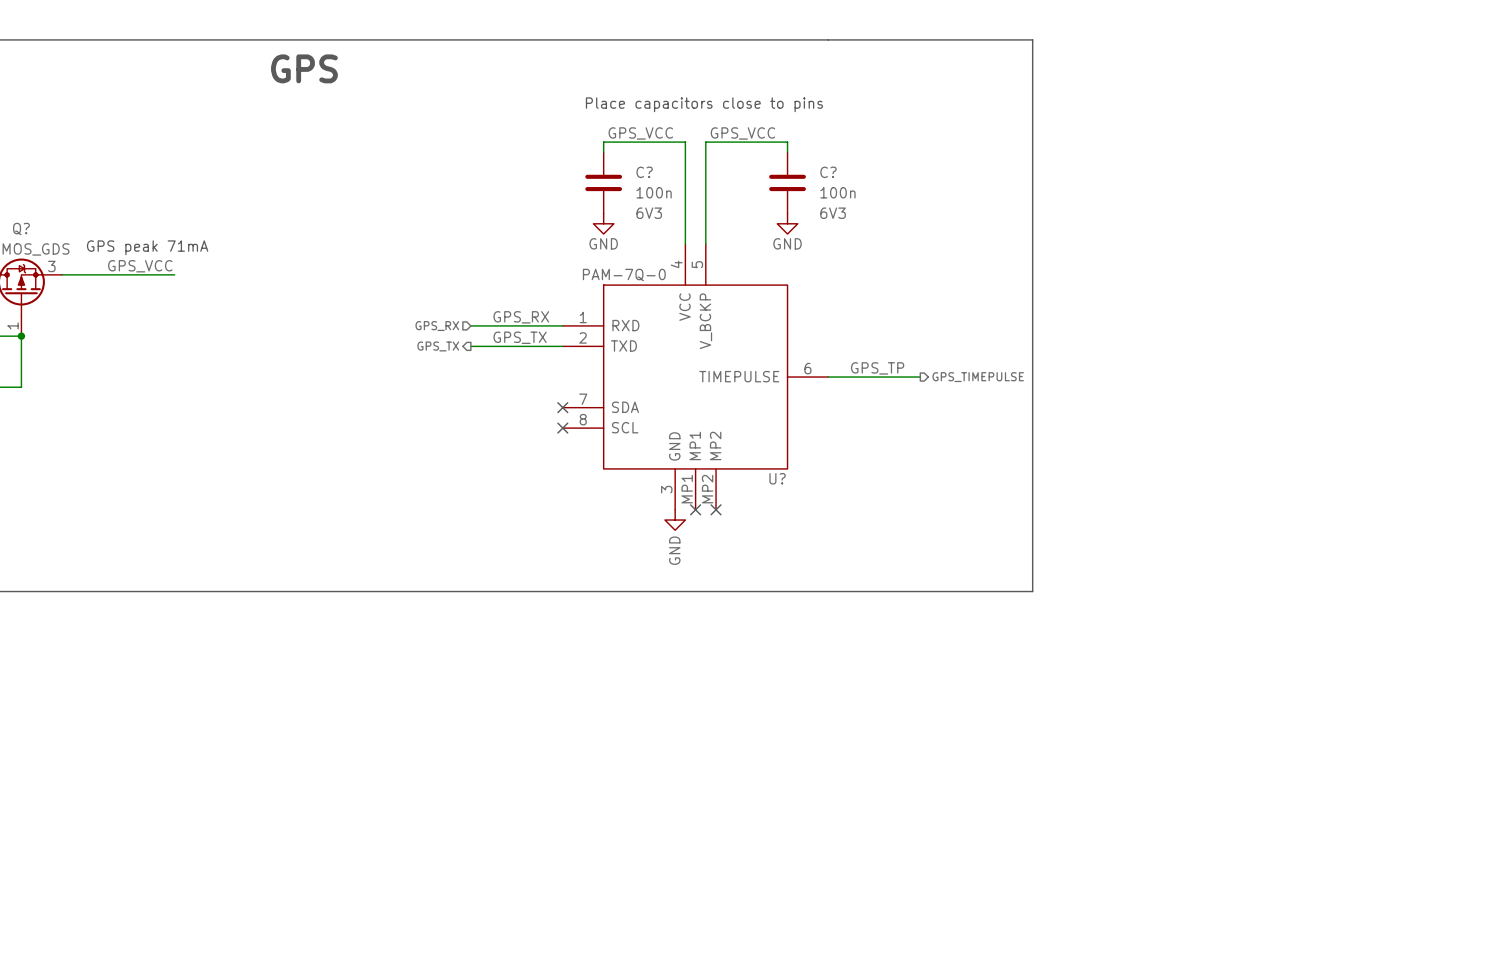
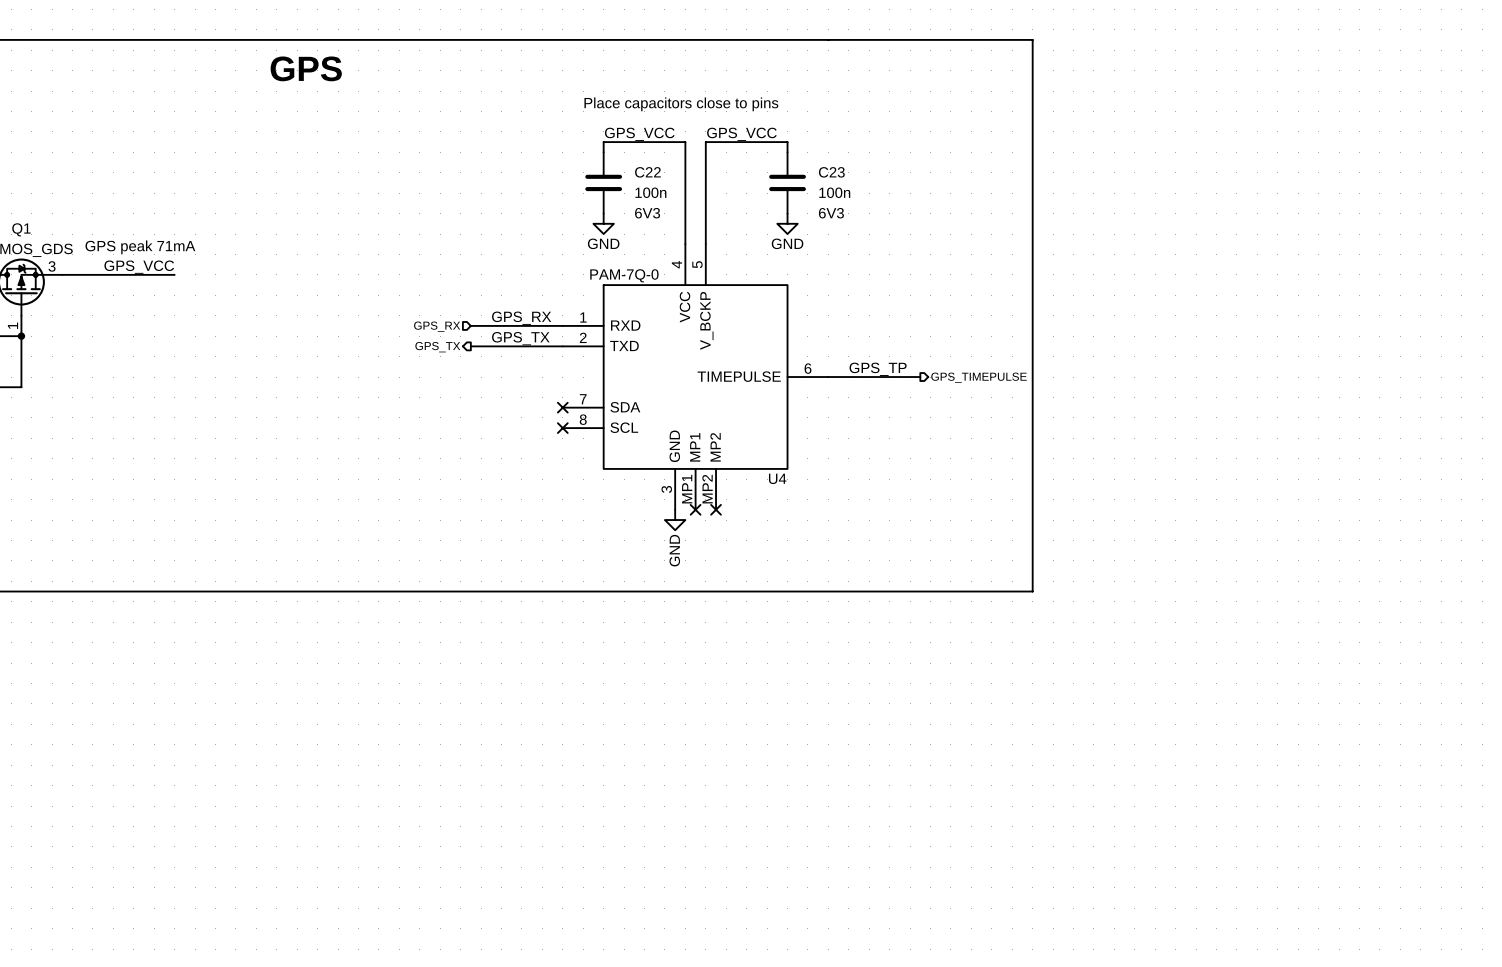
C? name: C? (644, 172) -> C22 (647, 172)
C? name: C? (828, 172) -> C23 (831, 172)
Q? name: Q? (21, 229) -> Q1 (21, 229)
U? name: U? (777, 478) -> U4 (777, 478)

